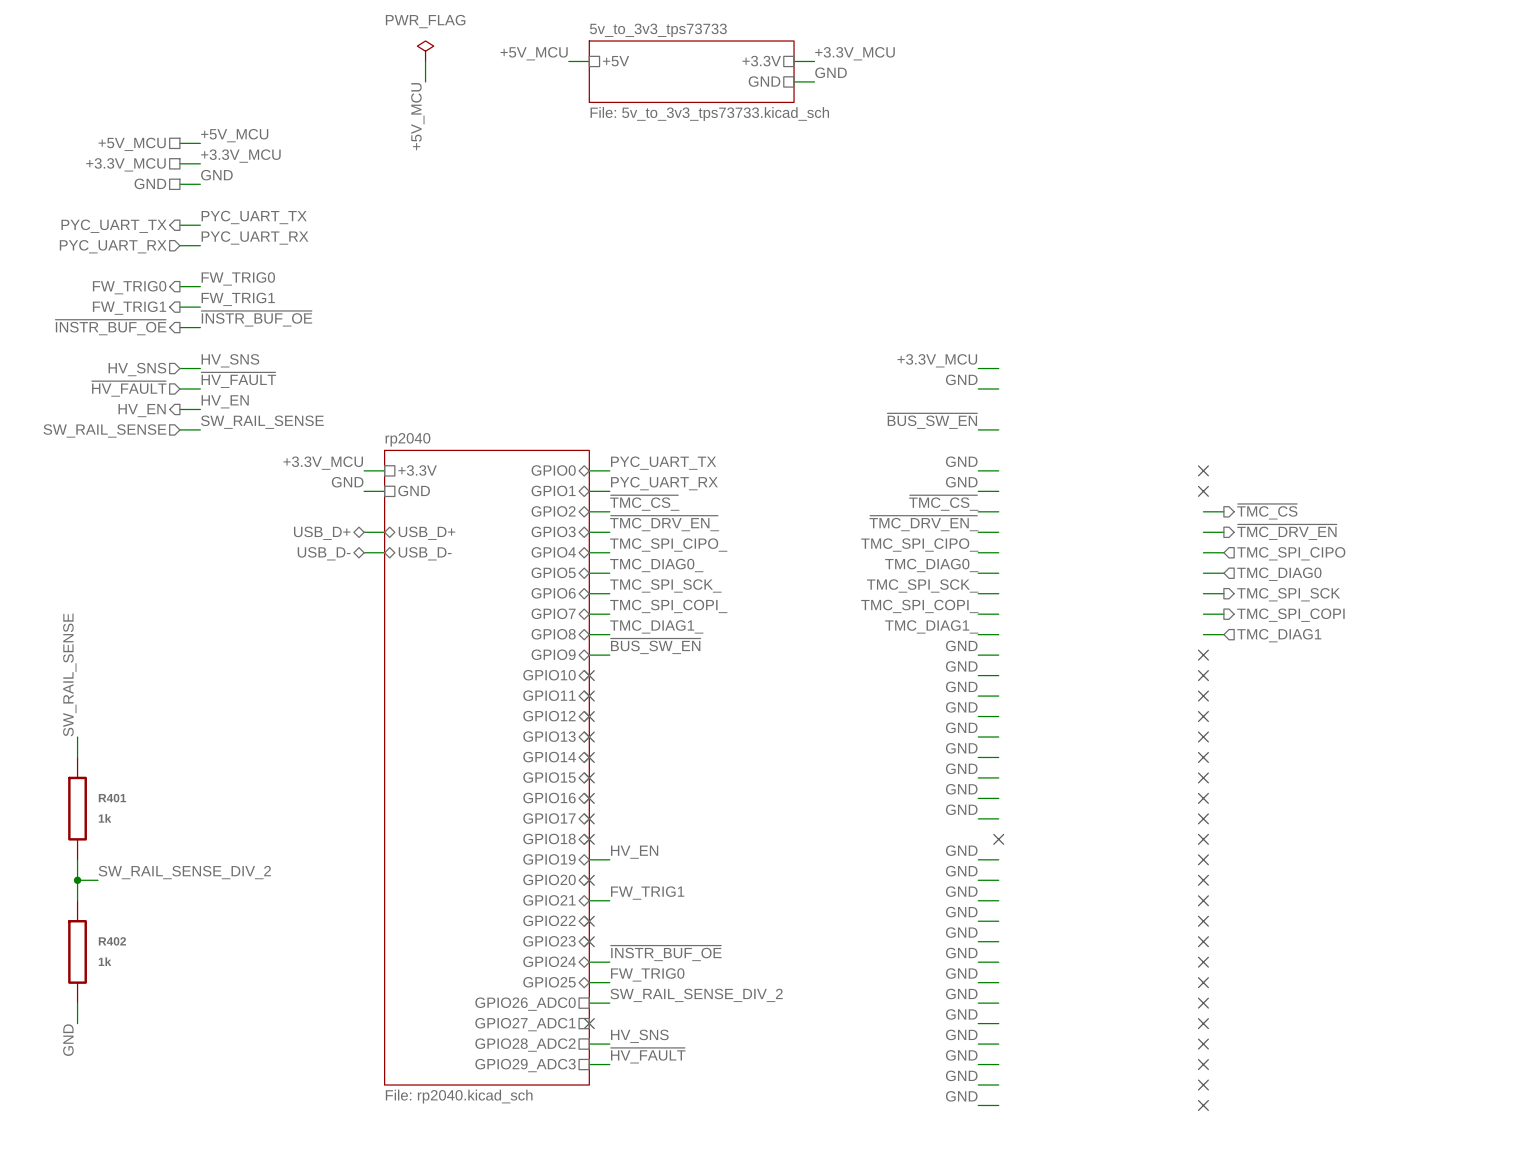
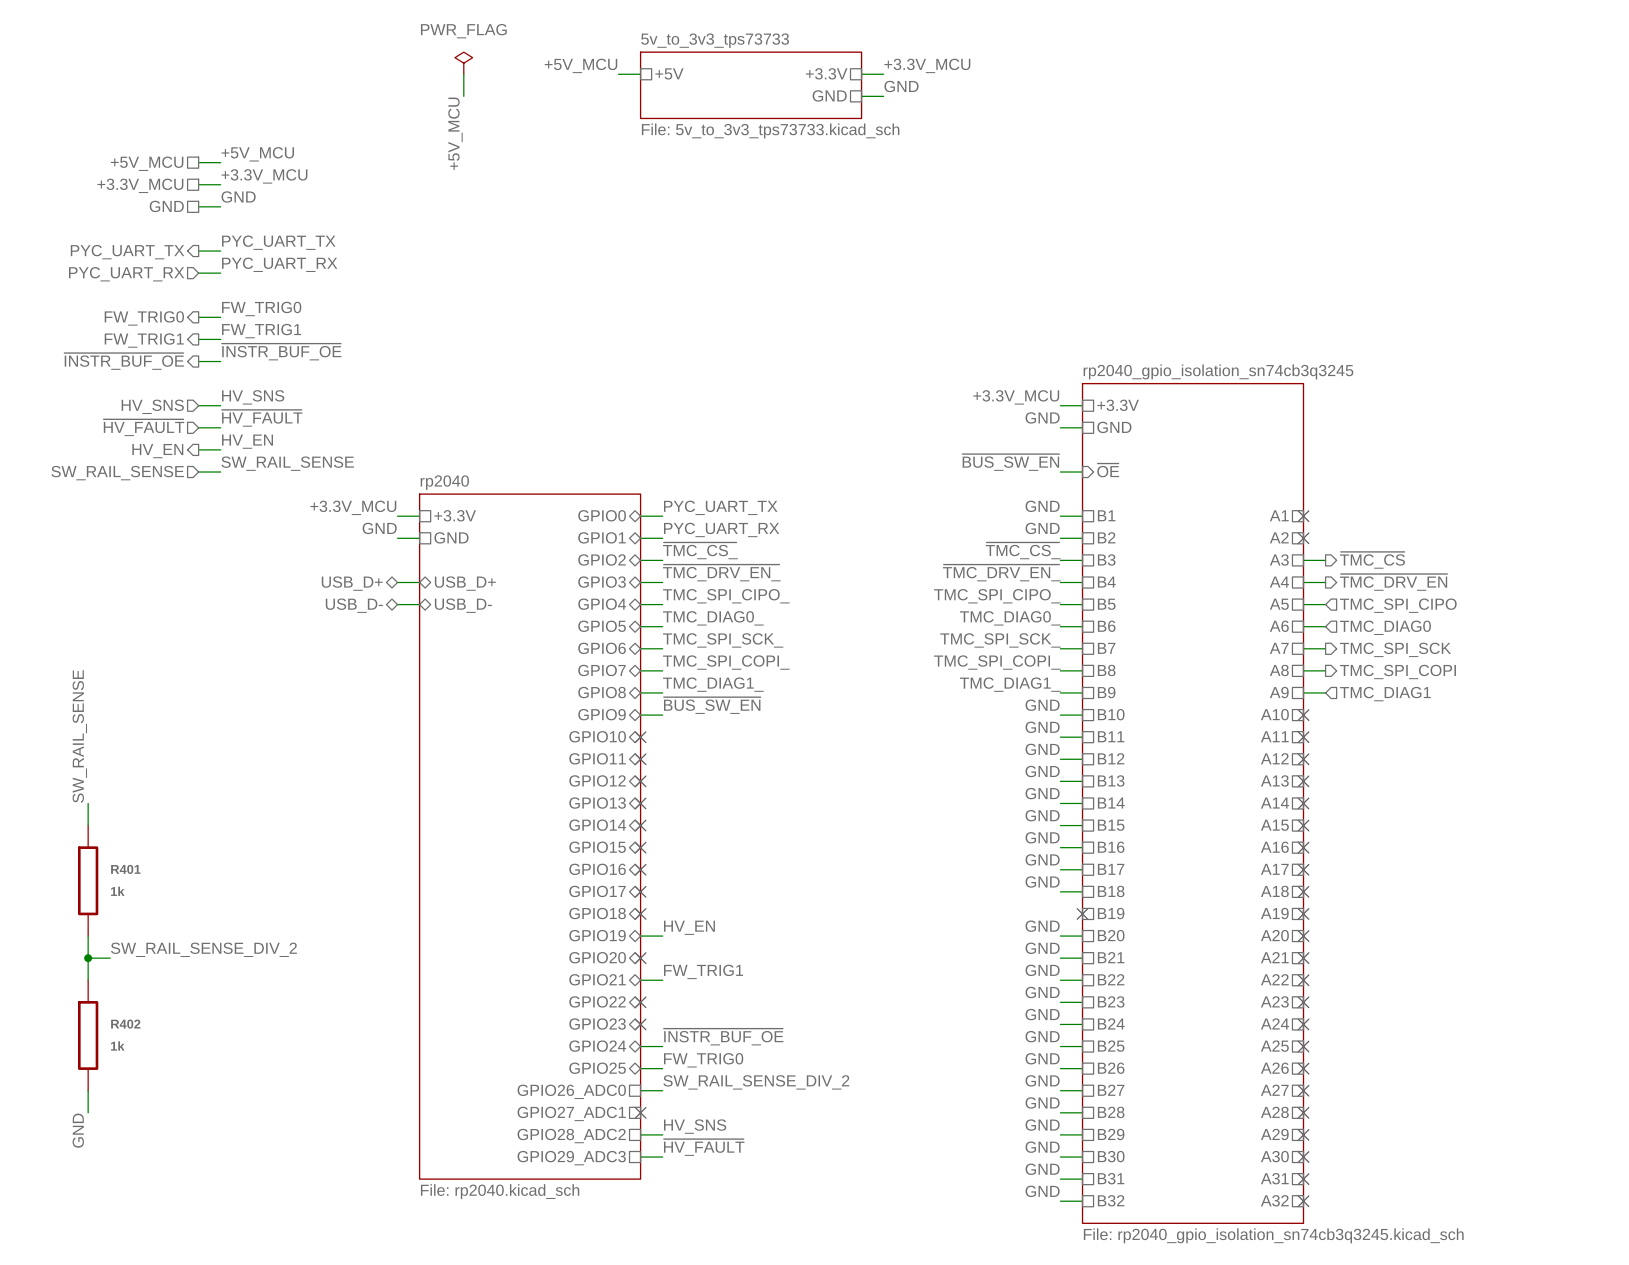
sheet pin: none -> +3.3V (1118, 405)
sheet pin: none -> GND (1114, 427)
sheet pin: none -> ~{OE} (1108, 470)
sheet pin: none -> B1 (1106, 515)
sheet pin: none -> A1 (1279, 515)
sheet pin: none -> B2 (1106, 537)
sheet pin: none -> A2 (1279, 537)
sheet pin: none -> B3 (1106, 559)
sheet pin: none -> A3 (1279, 559)
sheet pin: none -> B4 (1106, 582)
sheet pin: none -> A4 (1279, 582)
sheet pin: none -> B5 (1106, 604)
sheet pin: none -> A5 (1279, 604)
sheet pin: none -> B6 (1106, 626)
sheet pin: none -> A6 (1279, 626)
sheet pin: none -> B7 (1106, 648)
sheet pin: none -> A7 (1279, 648)
sheet pin: none -> B8 (1106, 670)
sheet pin: none -> A8 (1279, 670)
sheet pin: none -> B9 (1106, 692)
sheet pin: none -> A9 (1279, 692)
sheet pin: none -> B10 (1111, 714)
sheet pin: none -> A10 (1274, 714)
sheet pin: none -> B11 (1111, 736)
sheet pin: none -> A11 (1274, 736)
sheet pin: none -> B12 (1111, 758)
sheet pin: none -> A12 (1274, 758)
sheet pin: none -> B13 (1111, 780)
sheet pin: none -> A13 (1274, 780)
sheet pin: none -> B14 (1111, 803)
sheet pin: none -> A14 (1274, 803)
sheet rp2040_gpio_isolation_sn74cb3q3245: none -> File: rp2040_gpio_isolation_sn74cb3q3245.kicad_sch (1193, 803)
sheet pin: none -> B15 (1111, 825)
sheet pin: none -> A15 (1274, 825)
sheet pin: none -> B16 (1111, 847)
sheet pin: none -> A16 (1274, 847)
sheet pin: none -> B17 (1111, 869)
sheet pin: none -> A17 (1274, 869)
sheet pin: none -> B18 (1111, 891)
sheet pin: none -> A18 (1274, 891)
sheet pin: none -> B19 (1111, 913)
sheet pin: none -> A19 (1274, 913)
sheet pin: none -> B20 (1111, 935)
sheet pin: none -> A20 (1274, 935)
sheet pin: none -> B21 (1111, 957)
sheet pin: none -> A21 (1274, 957)
sheet pin: none -> B22 (1111, 979)
sheet pin: none -> A22 (1274, 979)
sheet pin: none -> B23 (1111, 1001)
sheet pin: none -> A23 (1274, 1001)
sheet pin: none -> B24 (1111, 1023)
sheet pin: none -> A24 (1274, 1023)
sheet pin: none -> B25 (1111, 1046)
sheet pin: none -> A25 (1274, 1046)
sheet pin: none -> B26 (1111, 1068)
sheet pin: none -> A26 (1274, 1068)
sheet pin: none -> B27 (1111, 1090)
sheet pin: none -> A27 (1274, 1090)
sheet pin: none -> B28 (1111, 1112)
sheet pin: none -> A28 (1274, 1112)
sheet pin: none -> B29 (1111, 1134)
sheet pin: none -> A29 (1274, 1134)
sheet pin: none -> B30 (1111, 1156)
sheet pin: none -> A30 (1274, 1156)
sheet pin: none -> B31 (1111, 1178)
sheet pin: none -> A31 (1274, 1178)
sheet pin: none -> B32 (1111, 1200)
sheet pin: none -> A32 (1274, 1200)

